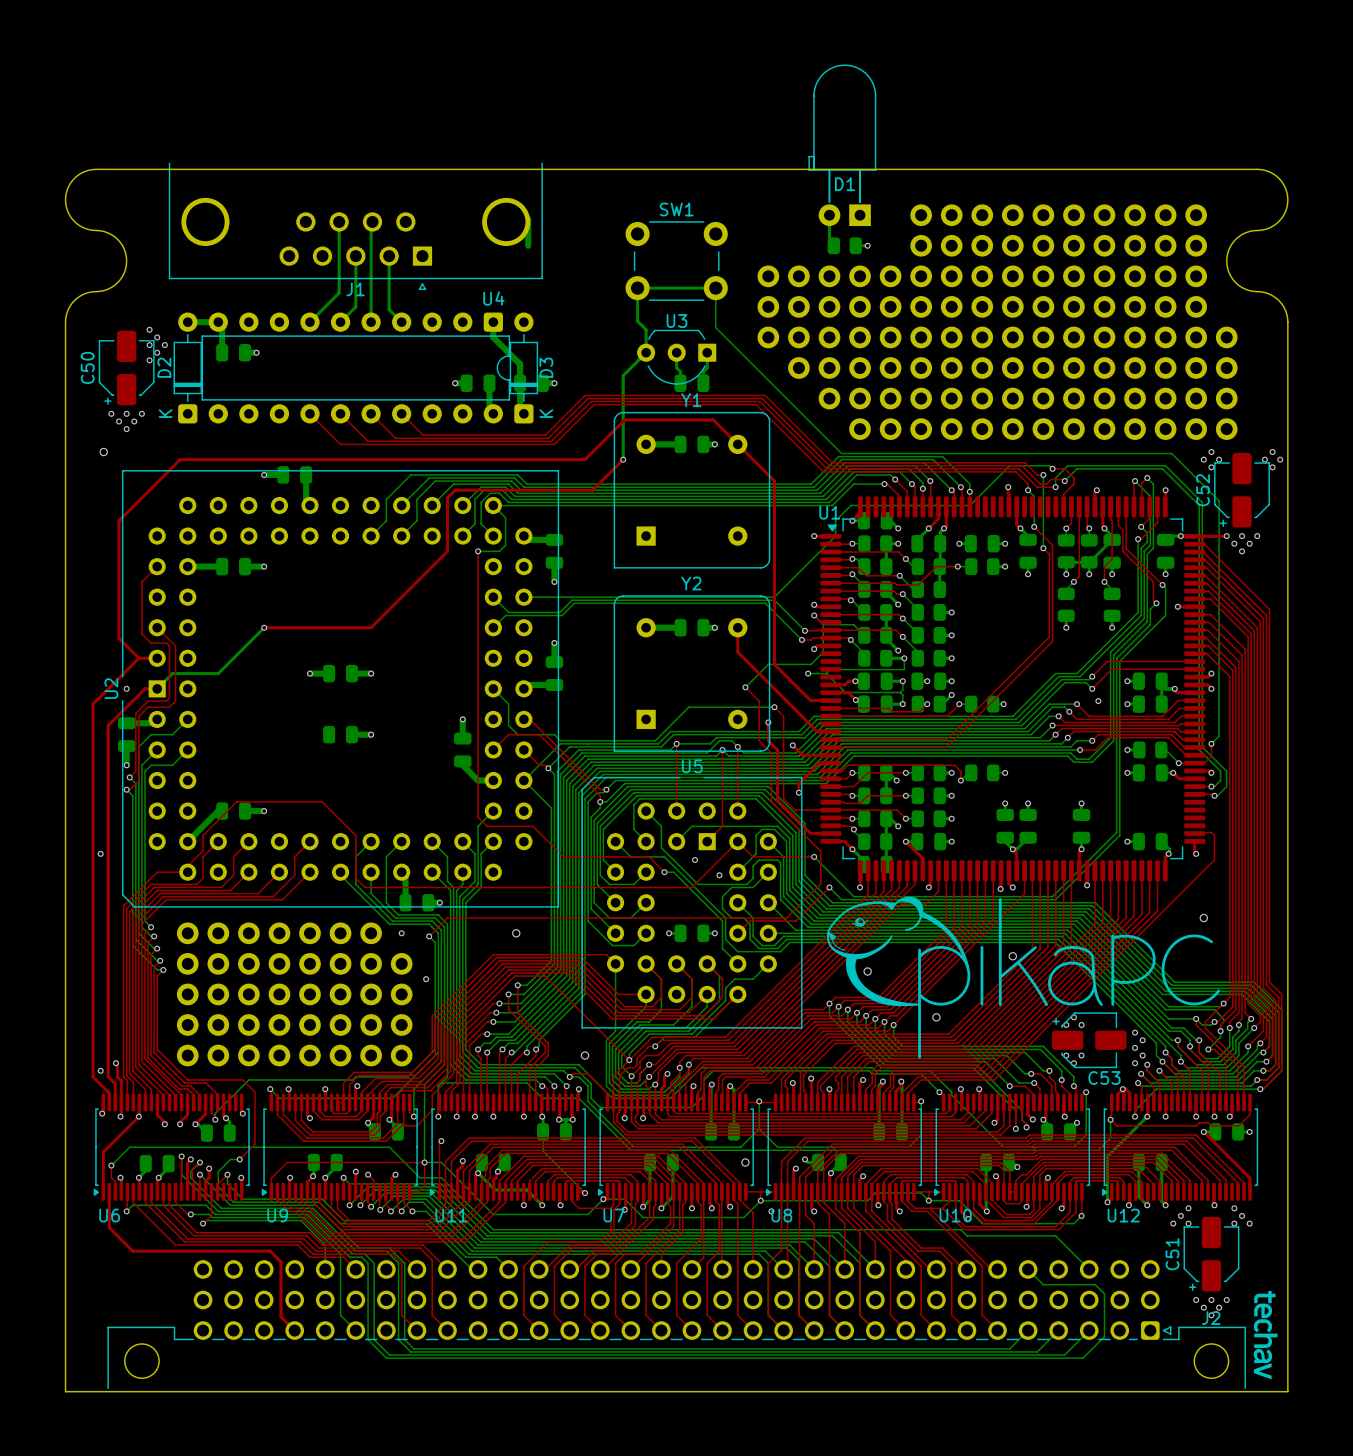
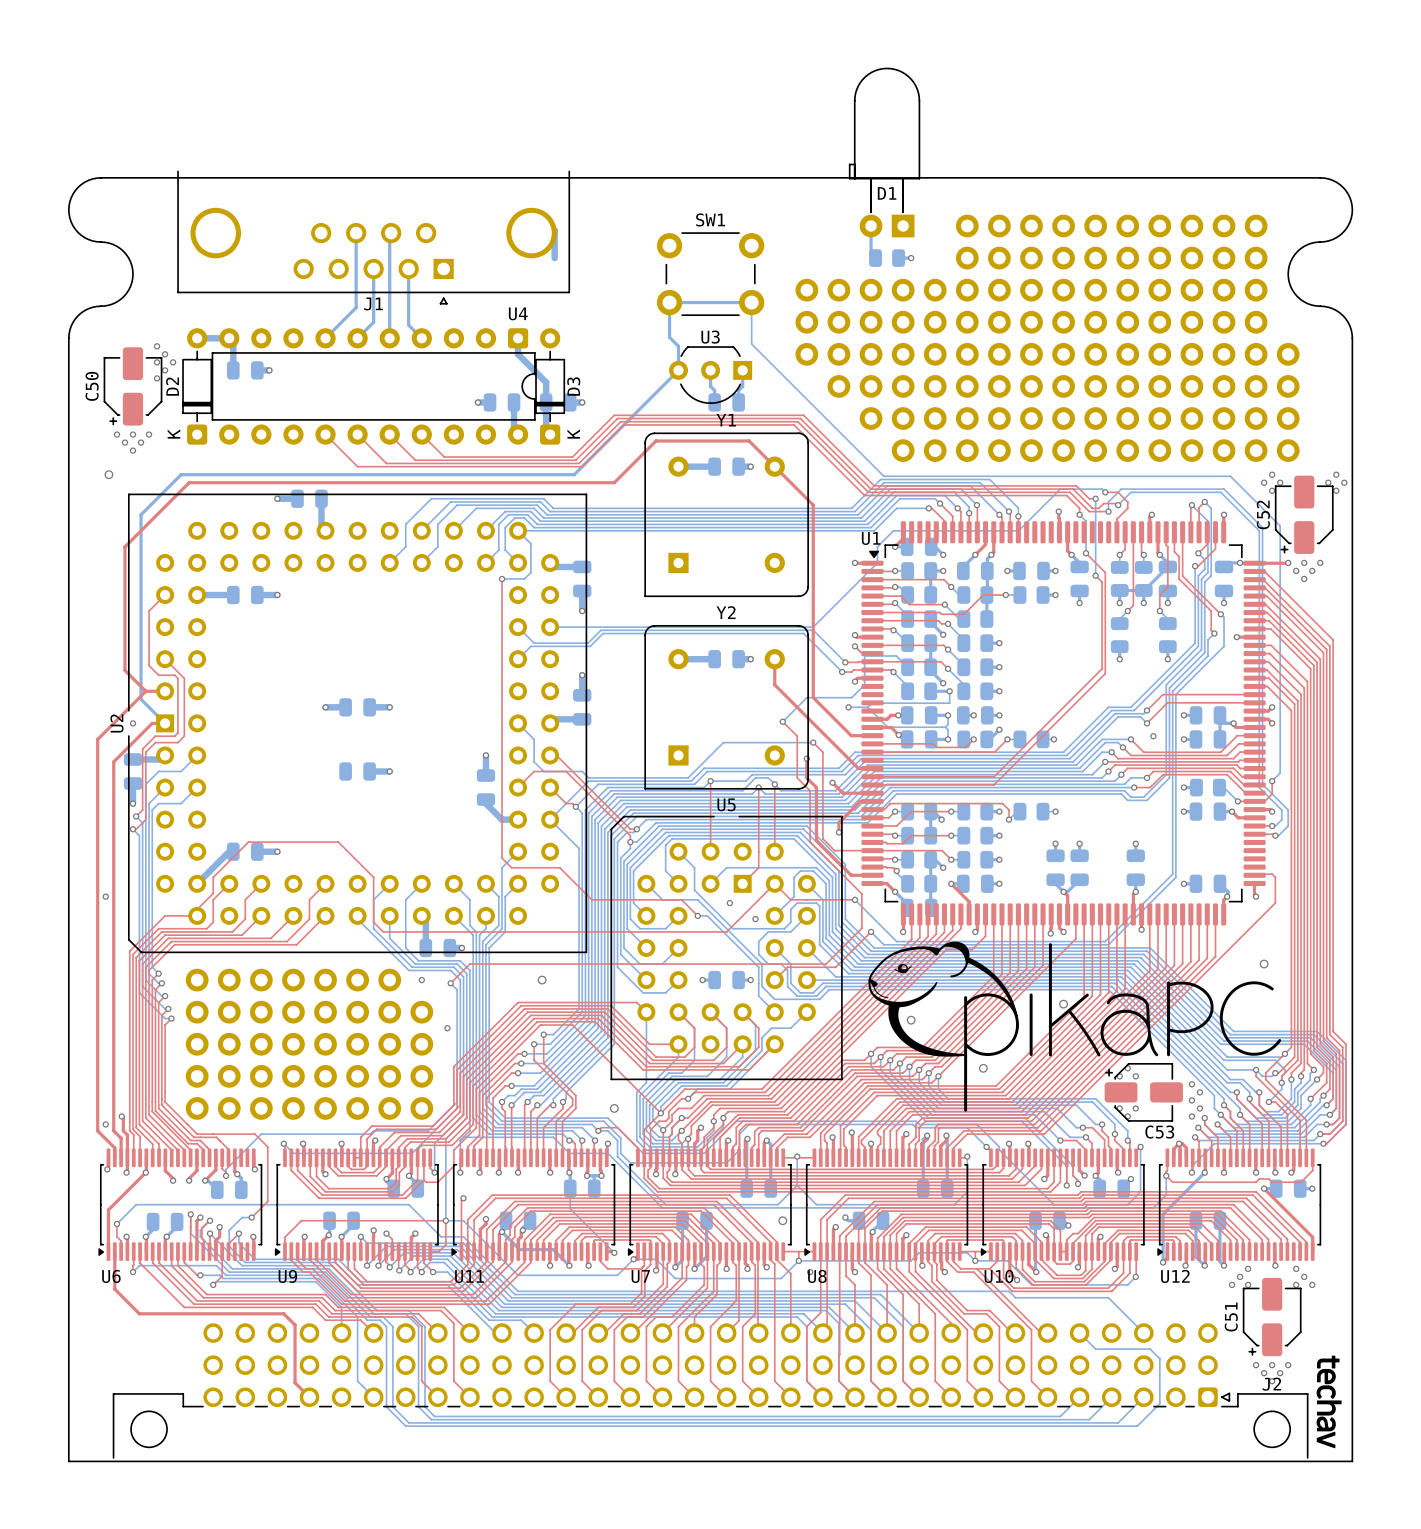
bottom track: (623, 375) (623, 459) -> none
top track: (623, 459) (592, 490) (455, 490) (447, 497) (447, 551) (371, 627) (264, 627) -> none
via: (623, 459) -> none
bottom track: (264, 627) (218, 673) (172, 673) (157, 688) -> (654, 394) (574, 474) (181, 474) (141, 514) (141, 699) (165, 723)
via: (264, 627) -> none

